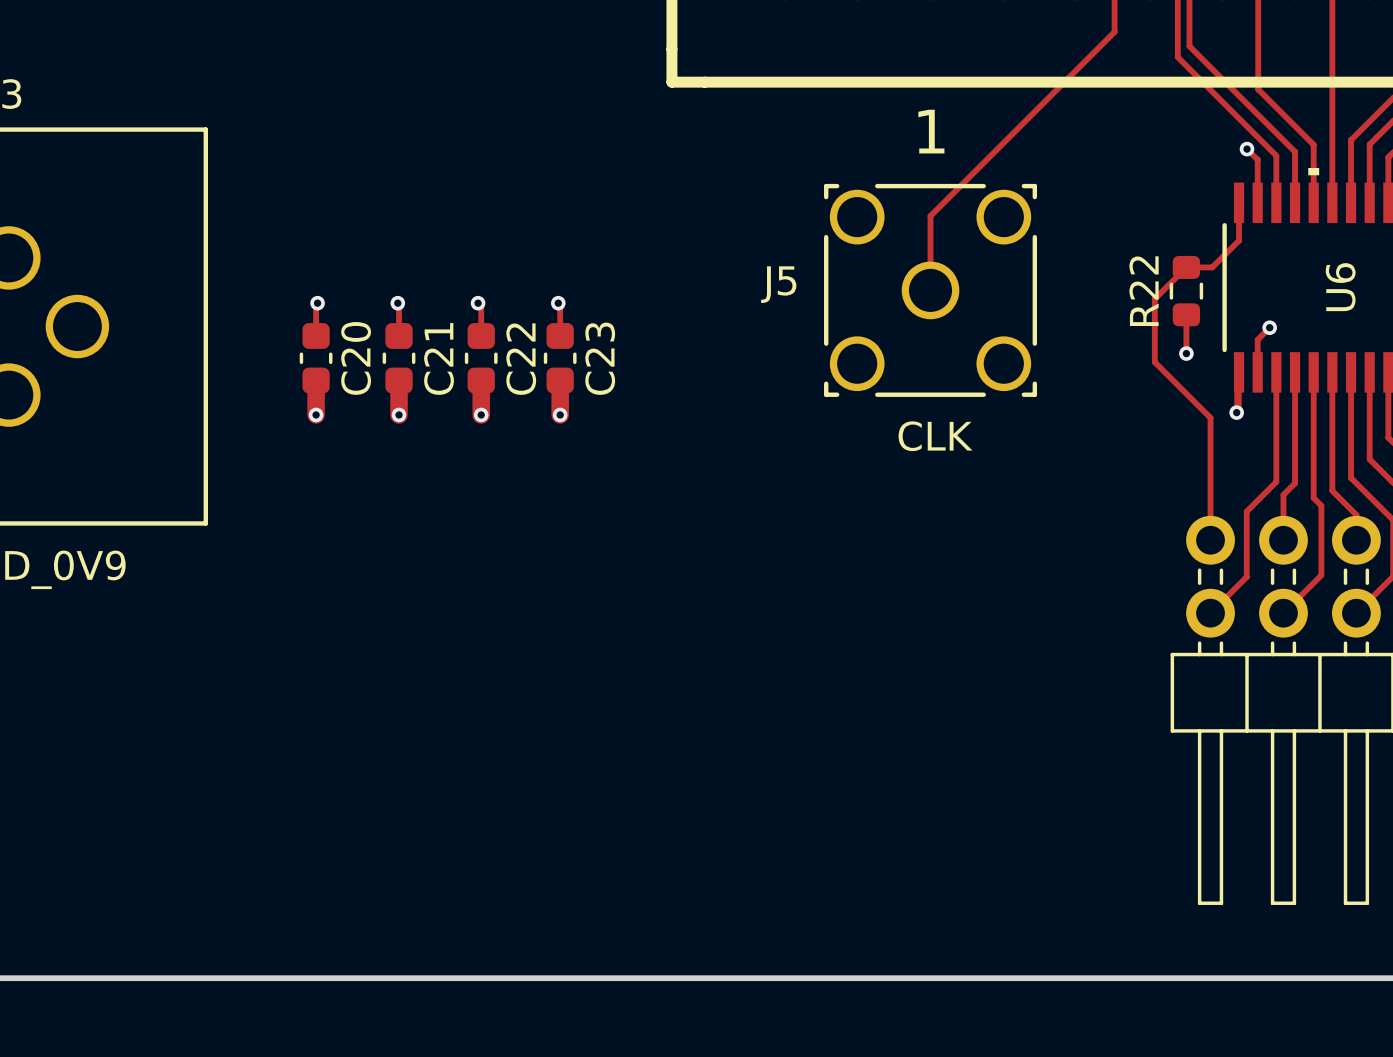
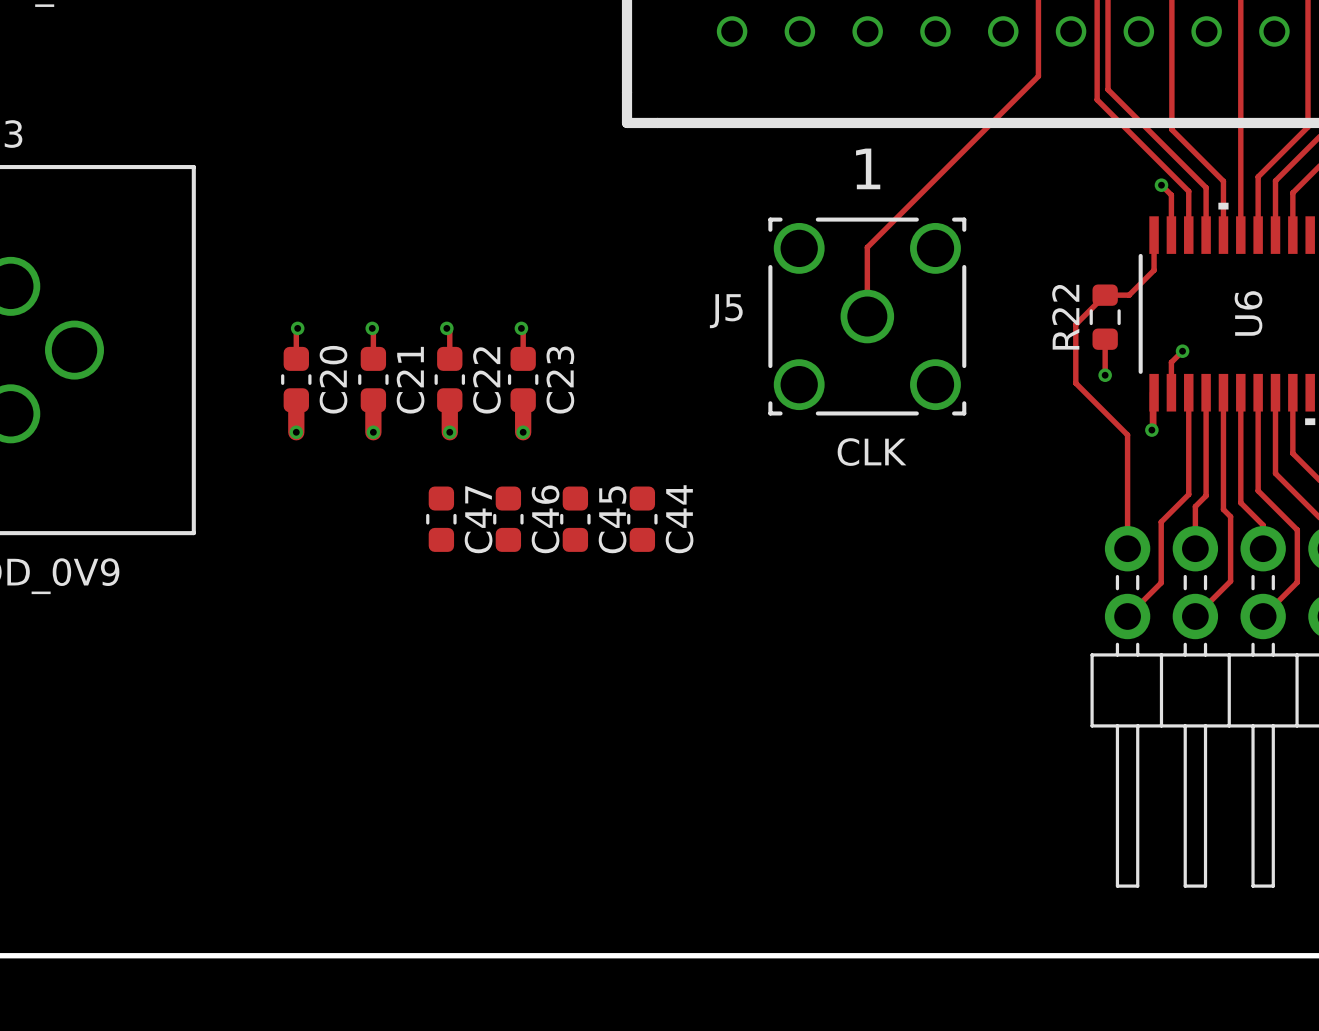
C47: none -> (441, 519)
C46: none -> (508, 519)
C45: none -> (575, 519)
C44: none -> (642, 519)

